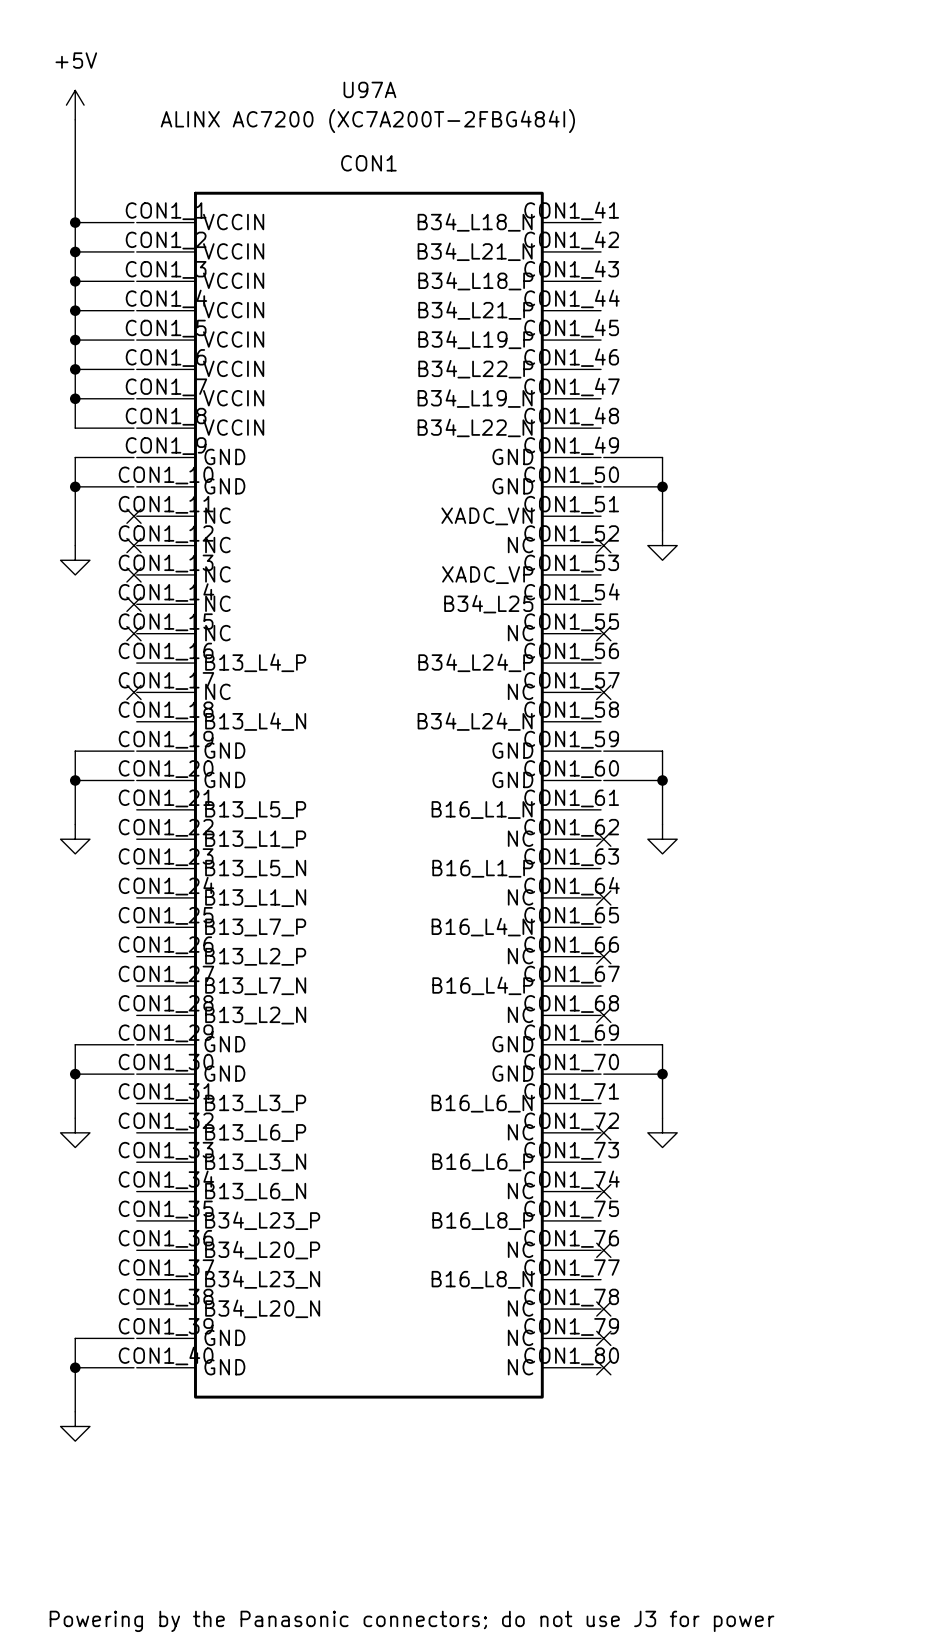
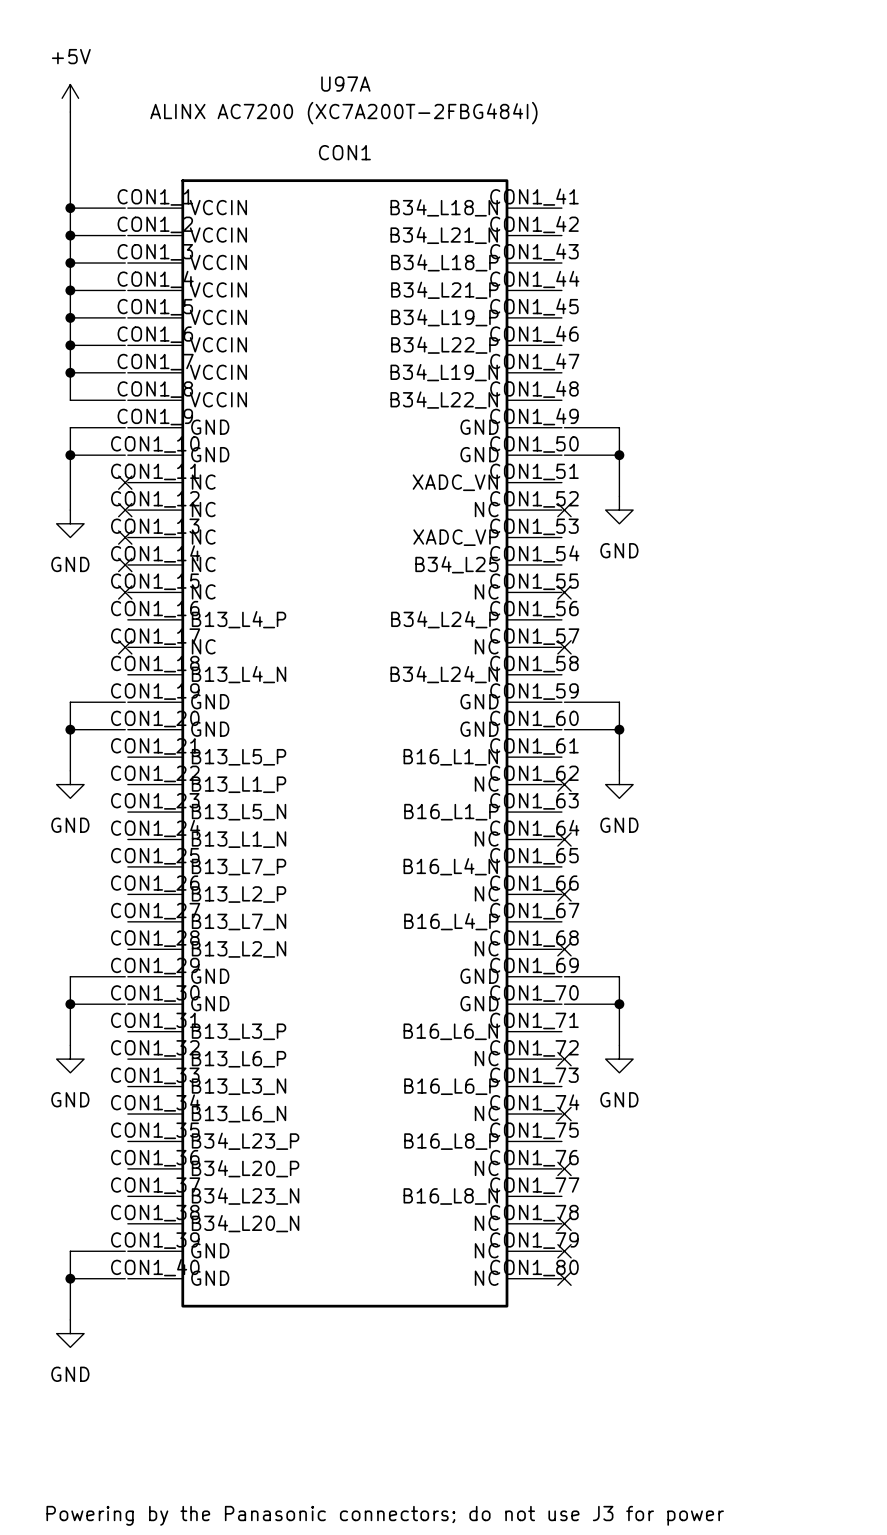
power symbol text: none -> GND (619, 550)
power symbol text: none -> GND (70, 564)
power symbol text: none -> GND (70, 825)
power symbol text: none -> GND (619, 825)
power symbol text: none -> GND (70, 1099)
power symbol text: none -> GND (619, 1099)
power symbol text: none -> GND (70, 1374)

